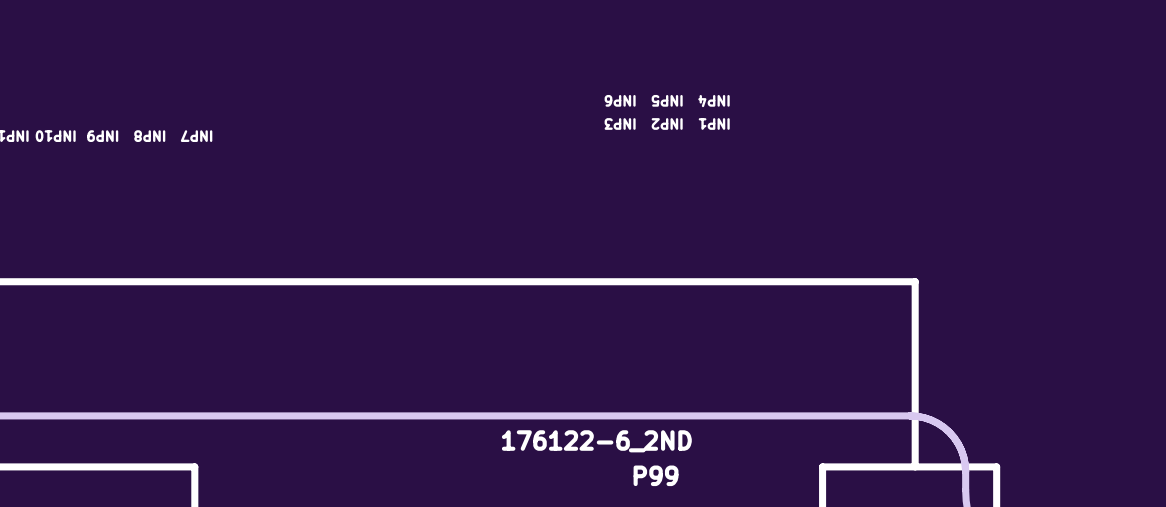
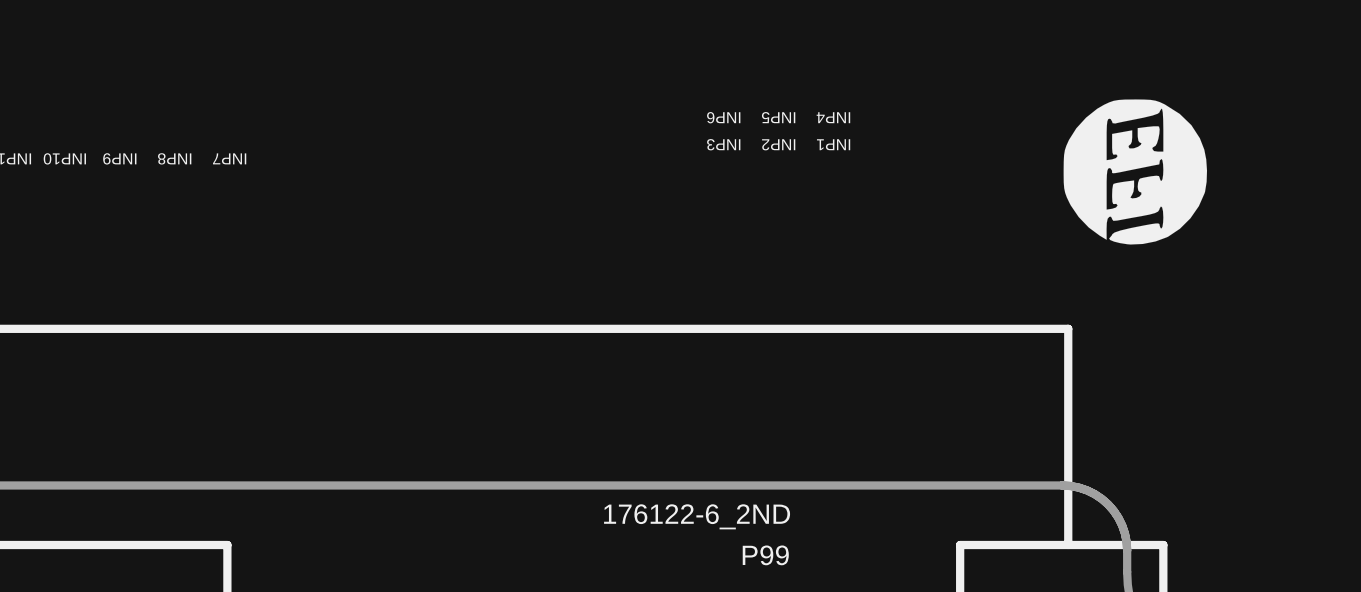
drawing: none -> [1063, 99, 1208, 245]

